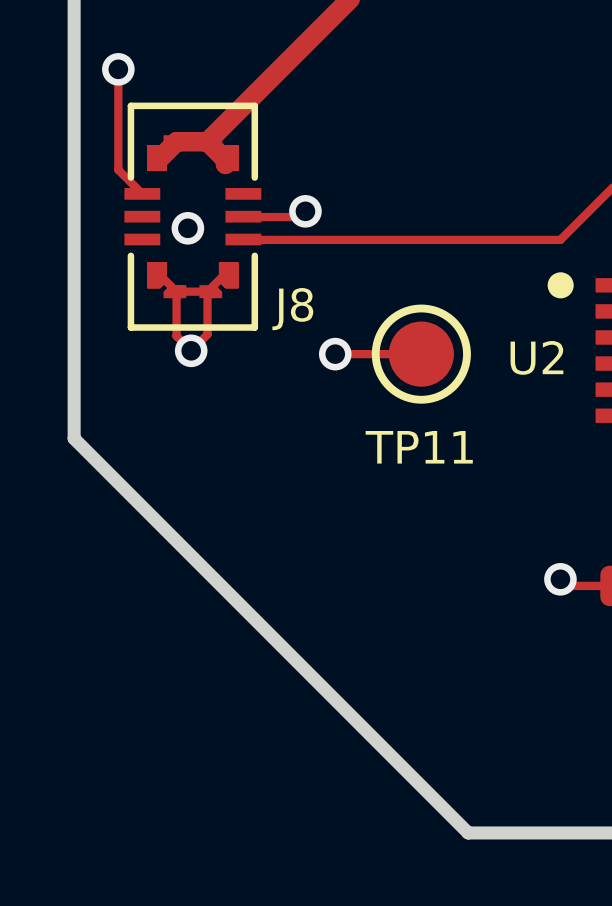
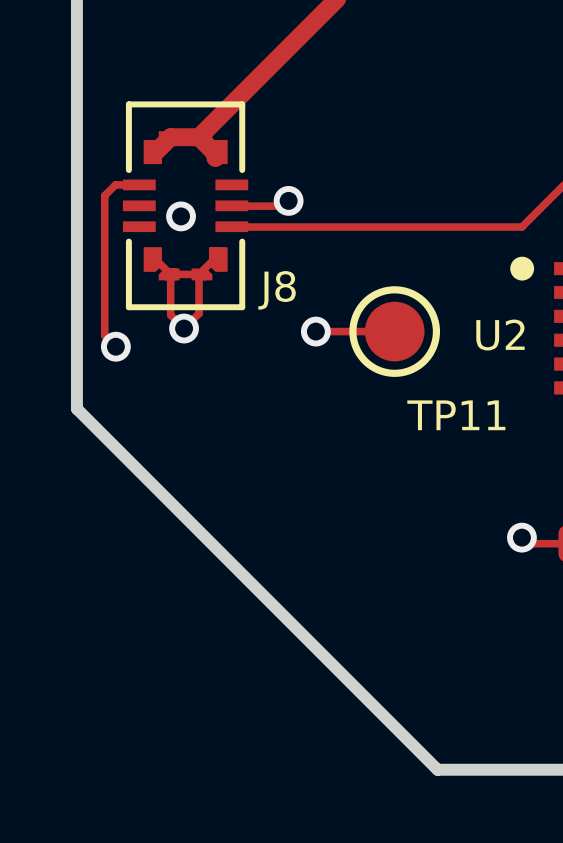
track: (118, 69) (118, 169) (142, 193) -> (115, 346) (104, 335) (104, 195) (115, 184) (139, 184)
via position: (118, 69) -> (115, 346)
TP11 name position: TP11 (419, 447) -> TP11 (456, 415)

